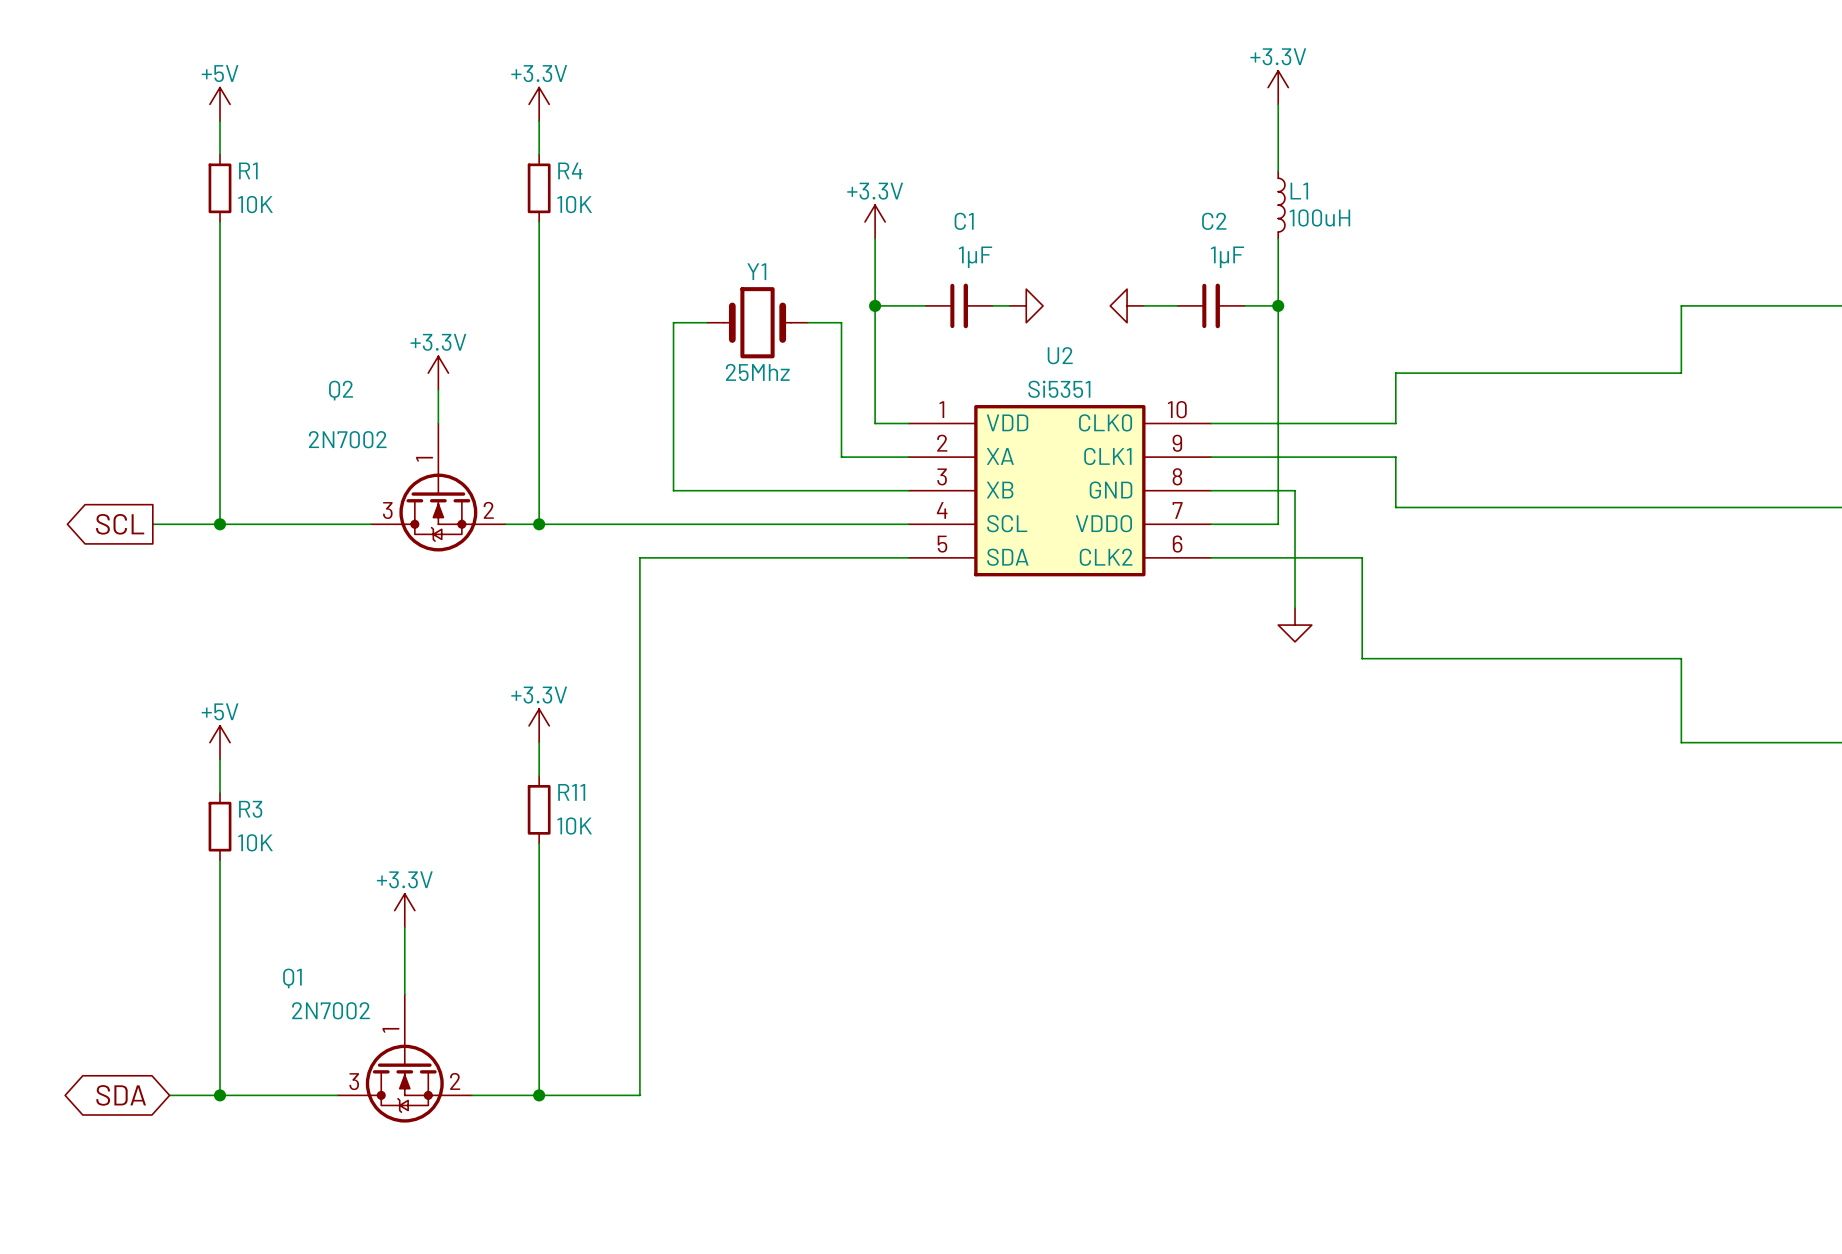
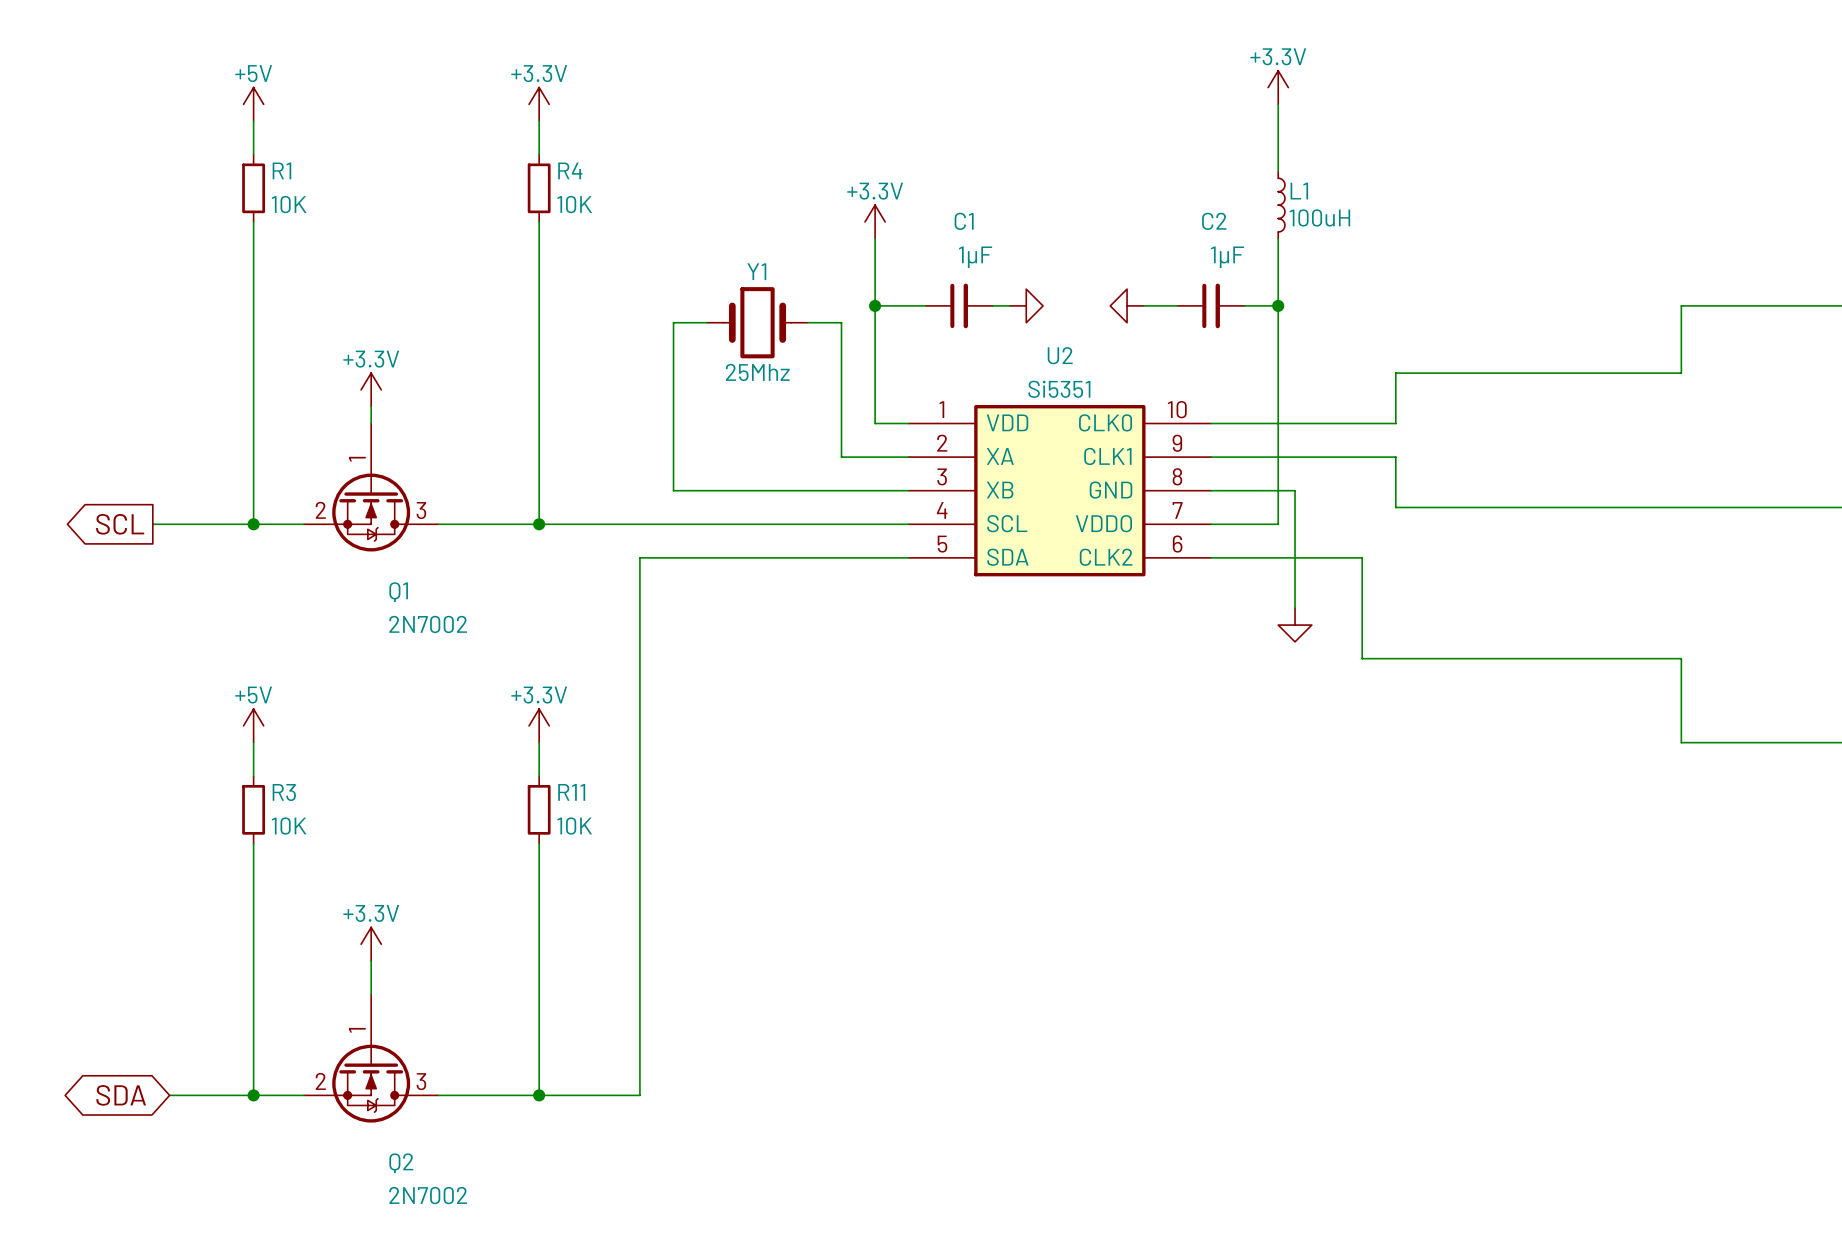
power symbol position: +5V (220, 104) -> +5V (253, 104)
wire: (220, 121) (220, 154) -> (253, 121) (253, 154)
R1 position: (220, 188) -> (253, 188)
wire: (220, 221) (220, 524) -> (253, 221) (253, 524)
power symbol position: +3.3V (438, 373) -> +3.3V (371, 389)
wire: (438, 389) (438, 423) -> none
Q2 name position: Q2 (341, 390) -> Q2 (401, 1163)
wire: none -> (371, 406) (371, 423)
Q2 value position: 2N7002 (347, 439) -> 2N7002 (428, 1195)
Q2 position: (438, 487) -> (371, 1058)
Q2 flip: as is (438, 512) -> left-right (371, 1083)
junction position: (220, 524) -> (253, 524)
power symbol position: +5V (220, 742) -> +5V (253, 725)
wire: (220, 759) (220, 793) -> (253, 742) (253, 776)
R3 position: (220, 826) -> (253, 809)
wire: none -> (253, 843) (253, 1095)
wire: (220, 860) (220, 1095) -> none
power symbol position: +3.3V (404, 910) -> +3.3V (371, 944)
wire: (404, 927) (404, 994) -> none
wire: none -> (371, 961) (371, 994)
Q1 name position: Q1 (292, 978) -> Q1 (398, 592)
Q1 value position: 2N7002 (330, 1010) -> 2N7002 (428, 624)
Q1 position: (404, 1058) -> (371, 487)
Q1 flip: as is (404, 1083) -> left-right (371, 512)
junction position: (220, 1095) -> (253, 1095)

